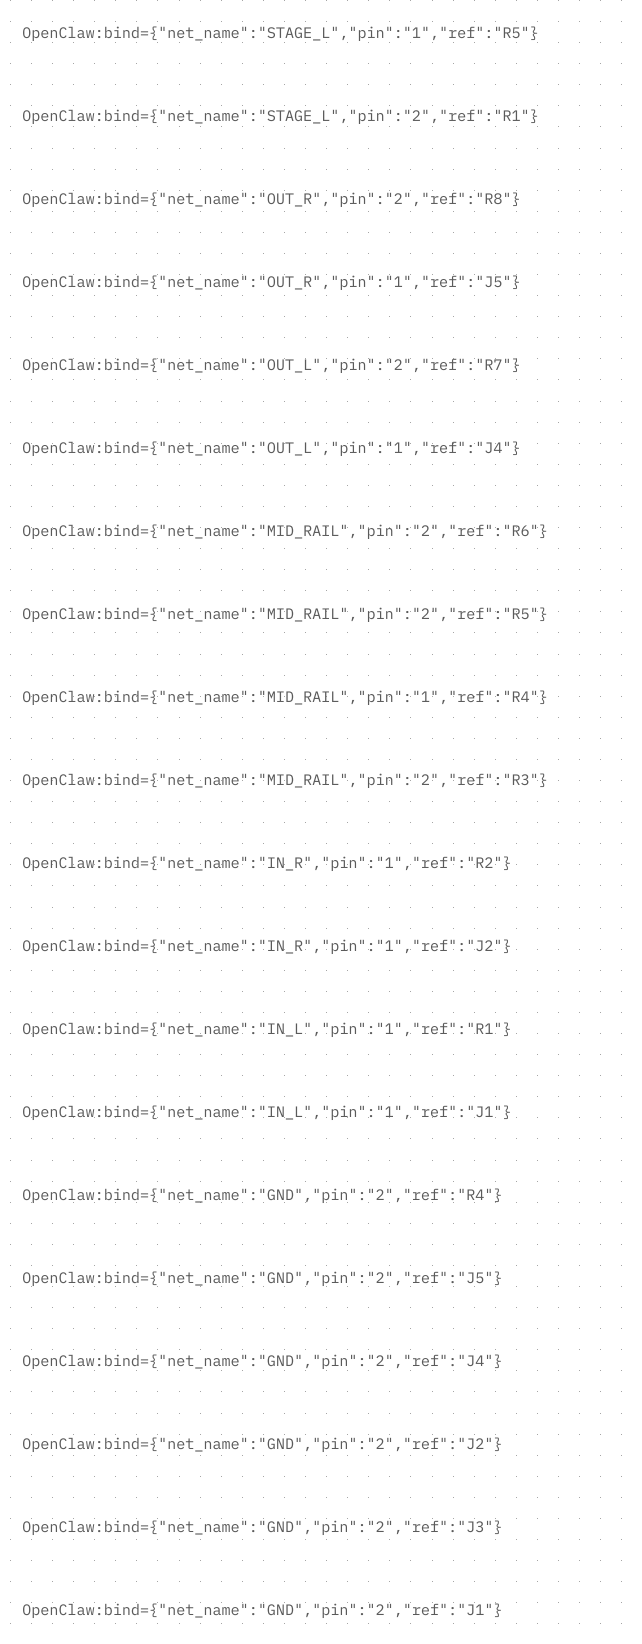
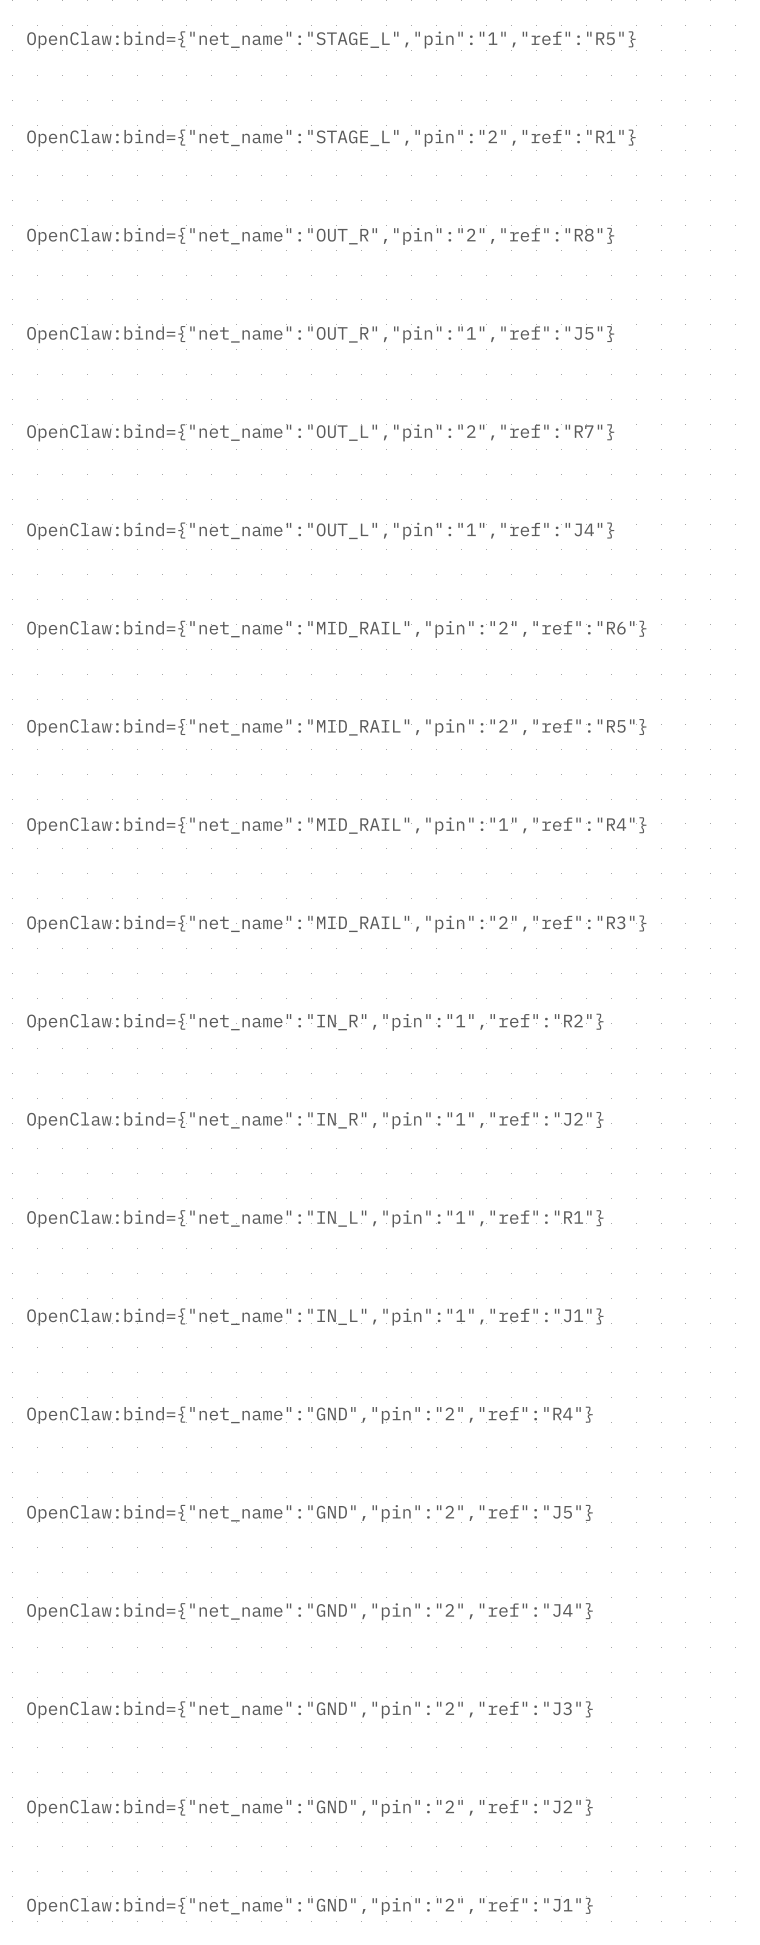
text: OpenClaw:bind={"net_name":"GND","pin":"2","ref":"J2"} (261, 1444) -> OpenClaw:bind={"net_name":"GND","pin":"2","ref":"J3"} (310, 1709)
text: OpenClaw:bind={"net_name":"GND","pin":"2","ref":"J3"} (261, 1527) -> OpenClaw:bind={"net_name":"GND","pin":"2","ref":"J2"} (310, 1808)

